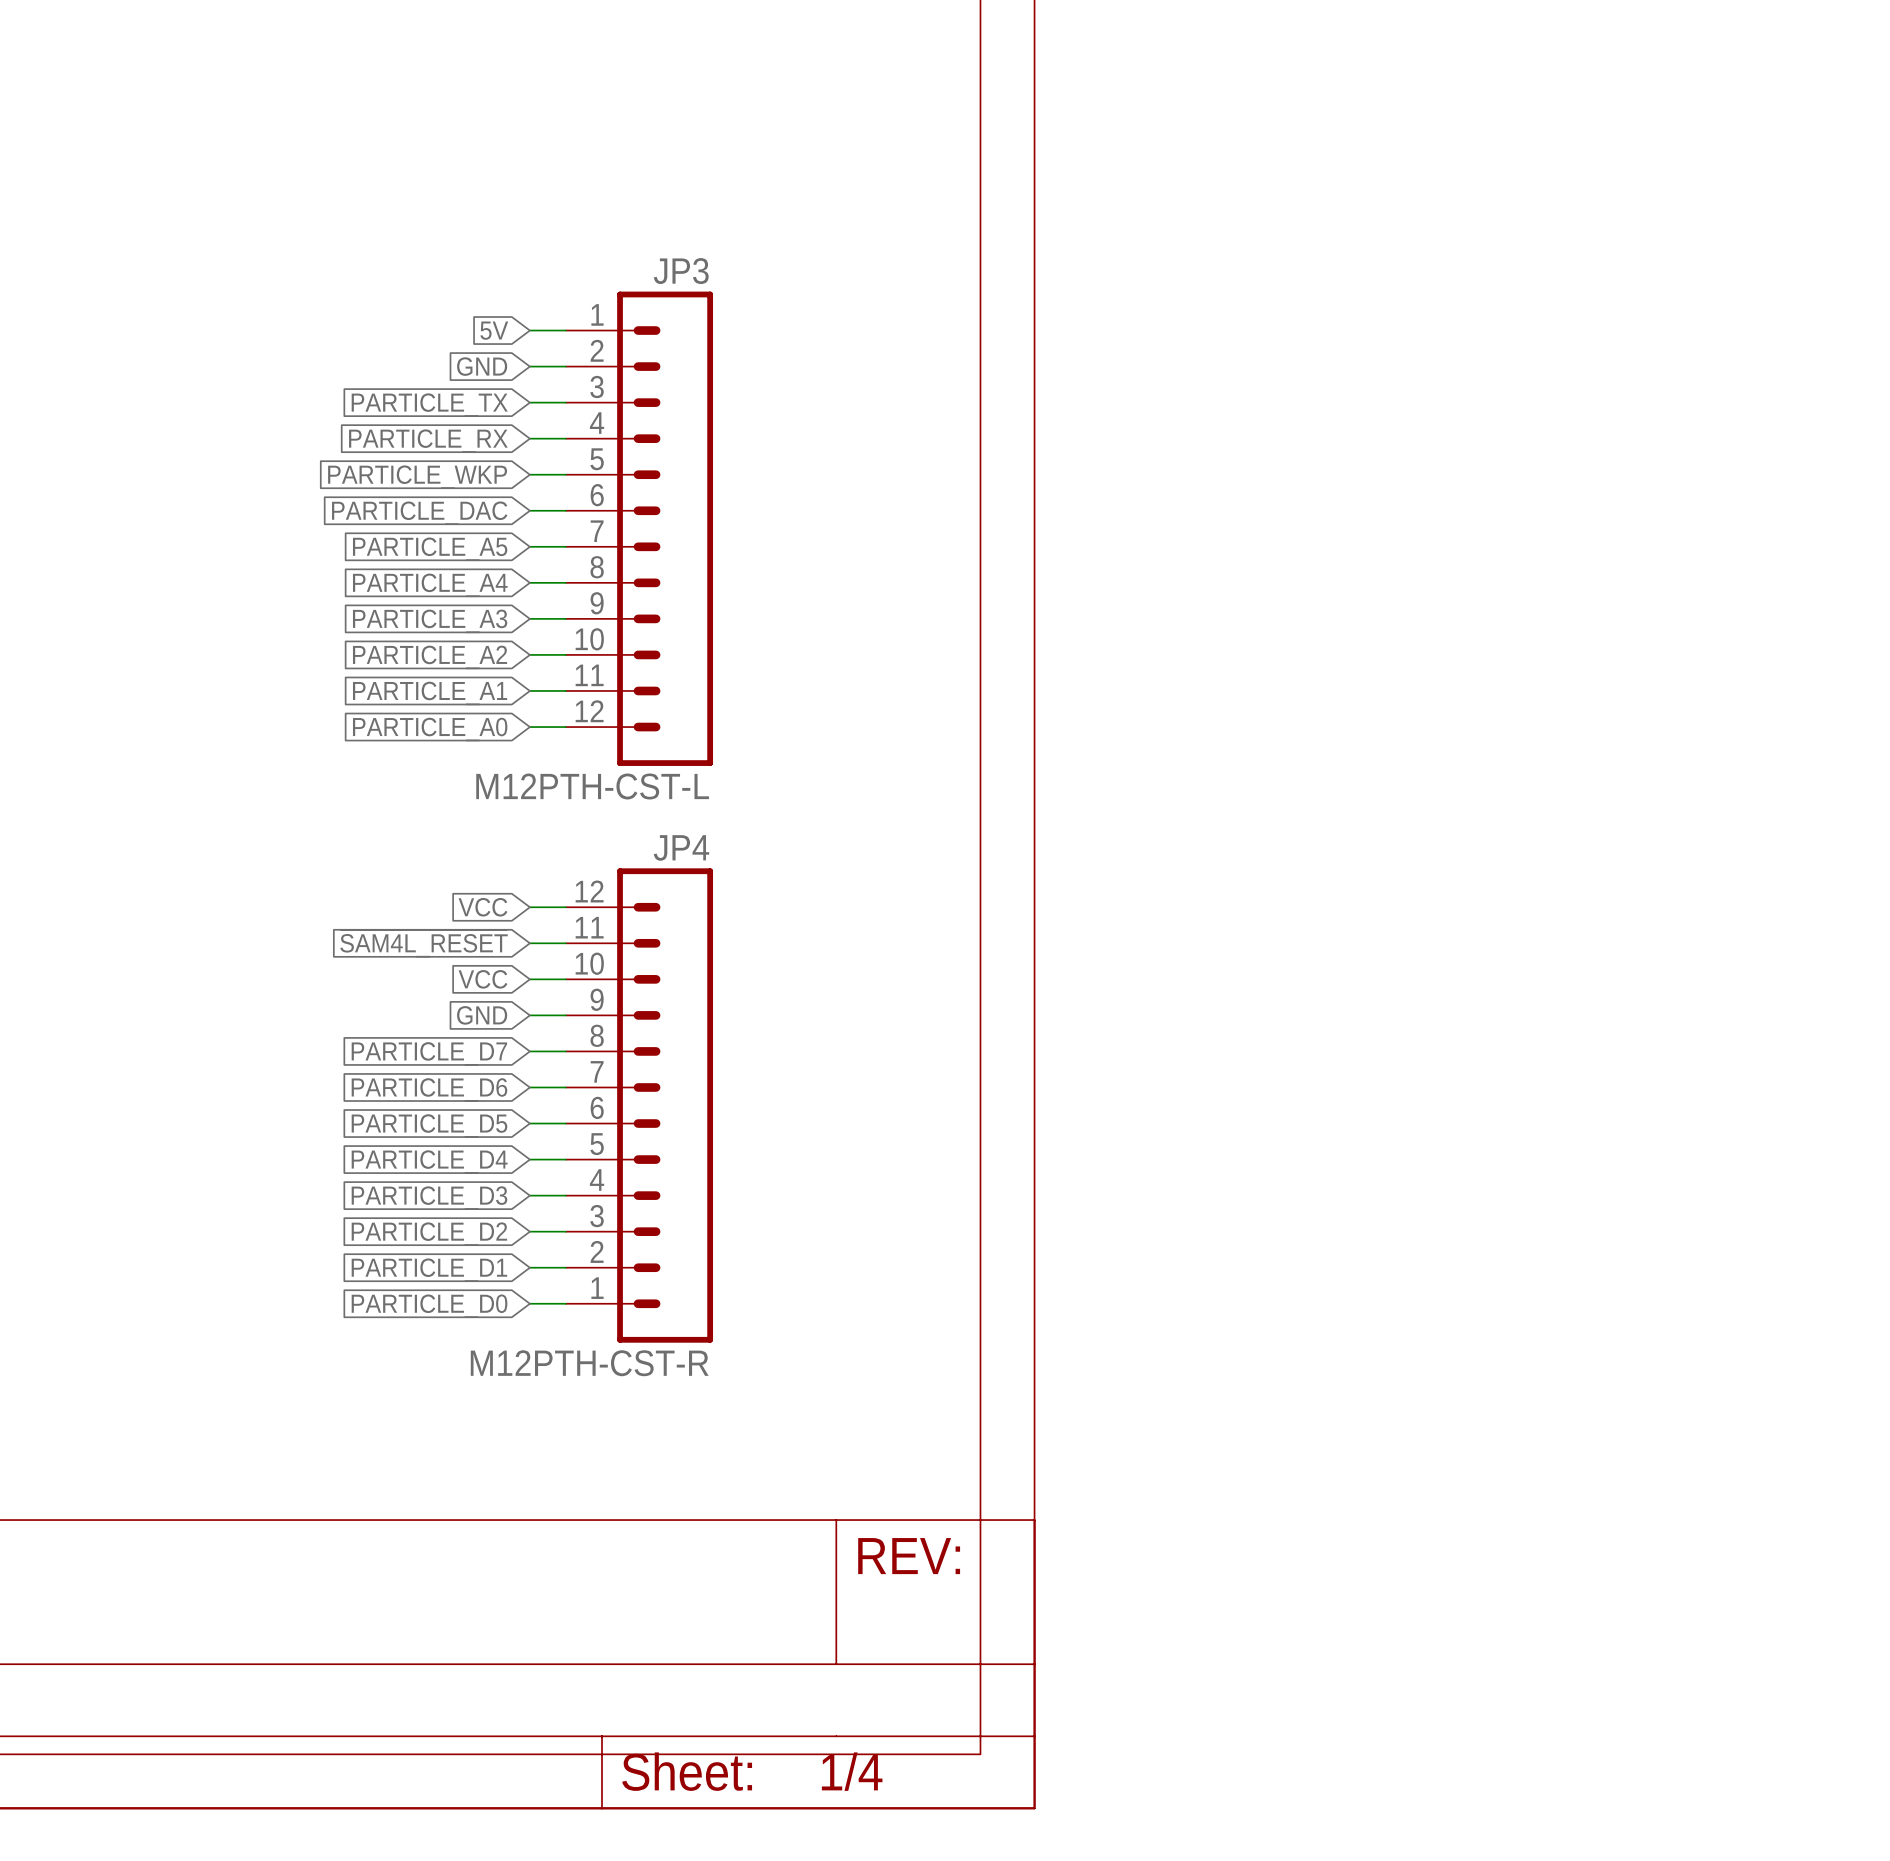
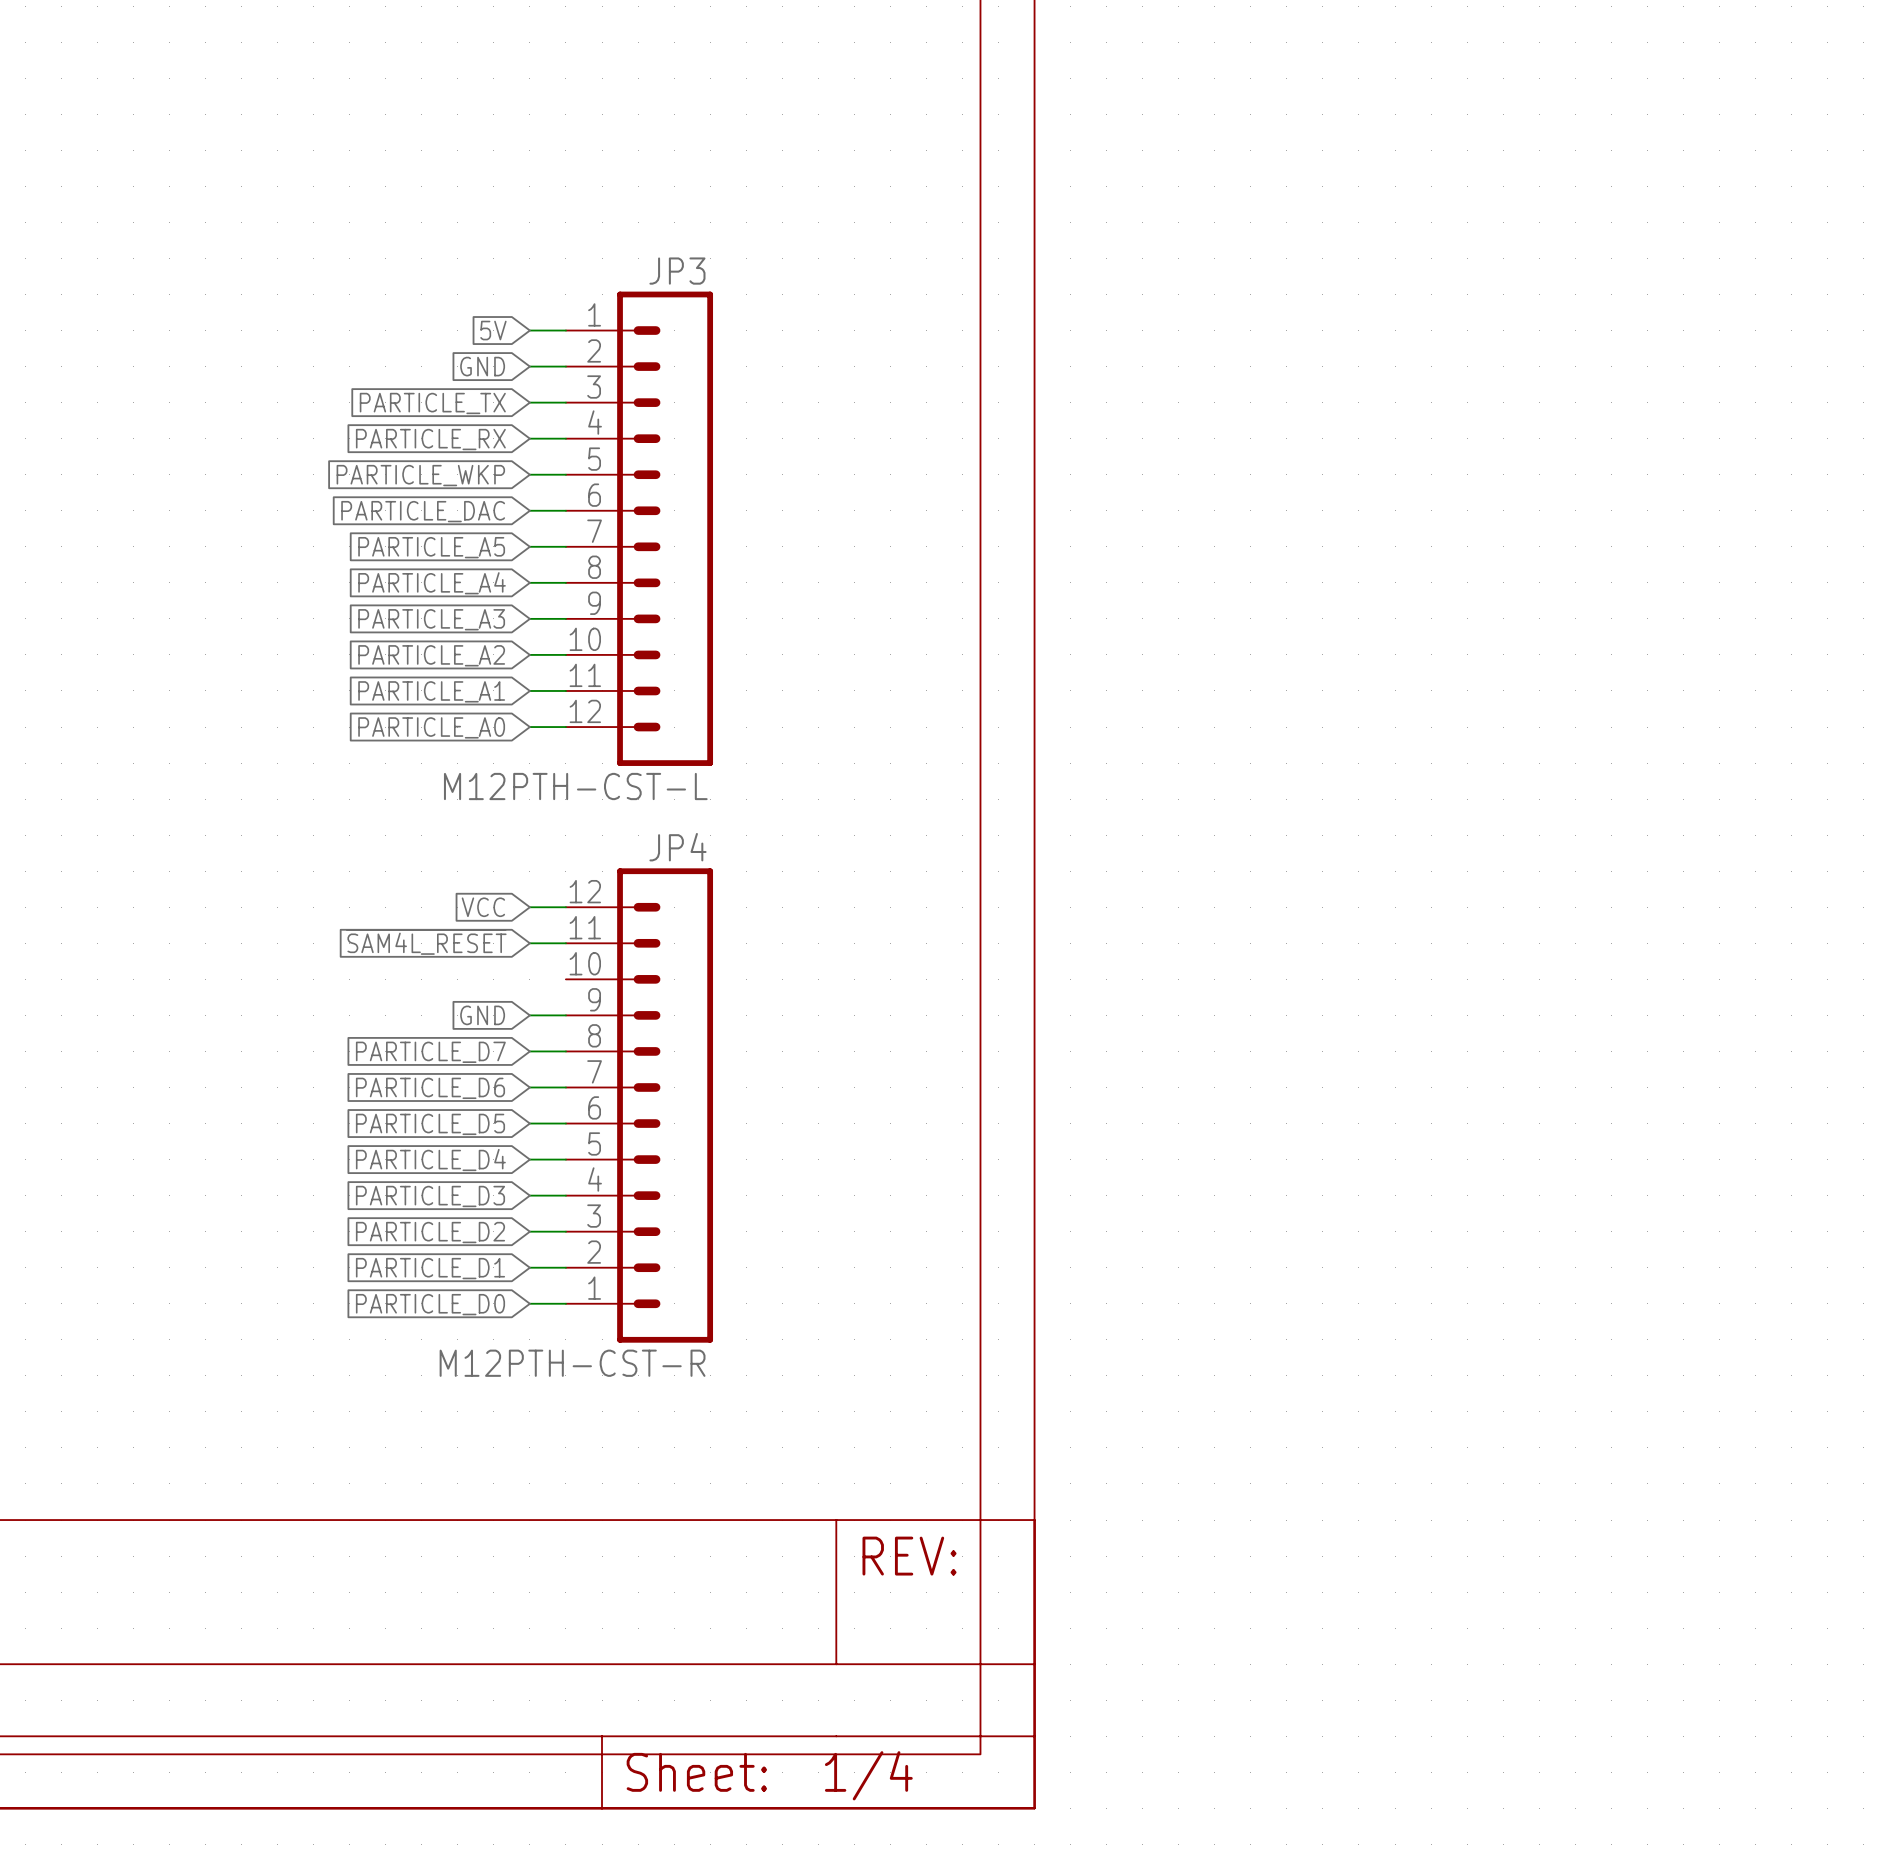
global label: VCC (482, 979) -> none
wire: (529, 979) (565, 979) -> none

